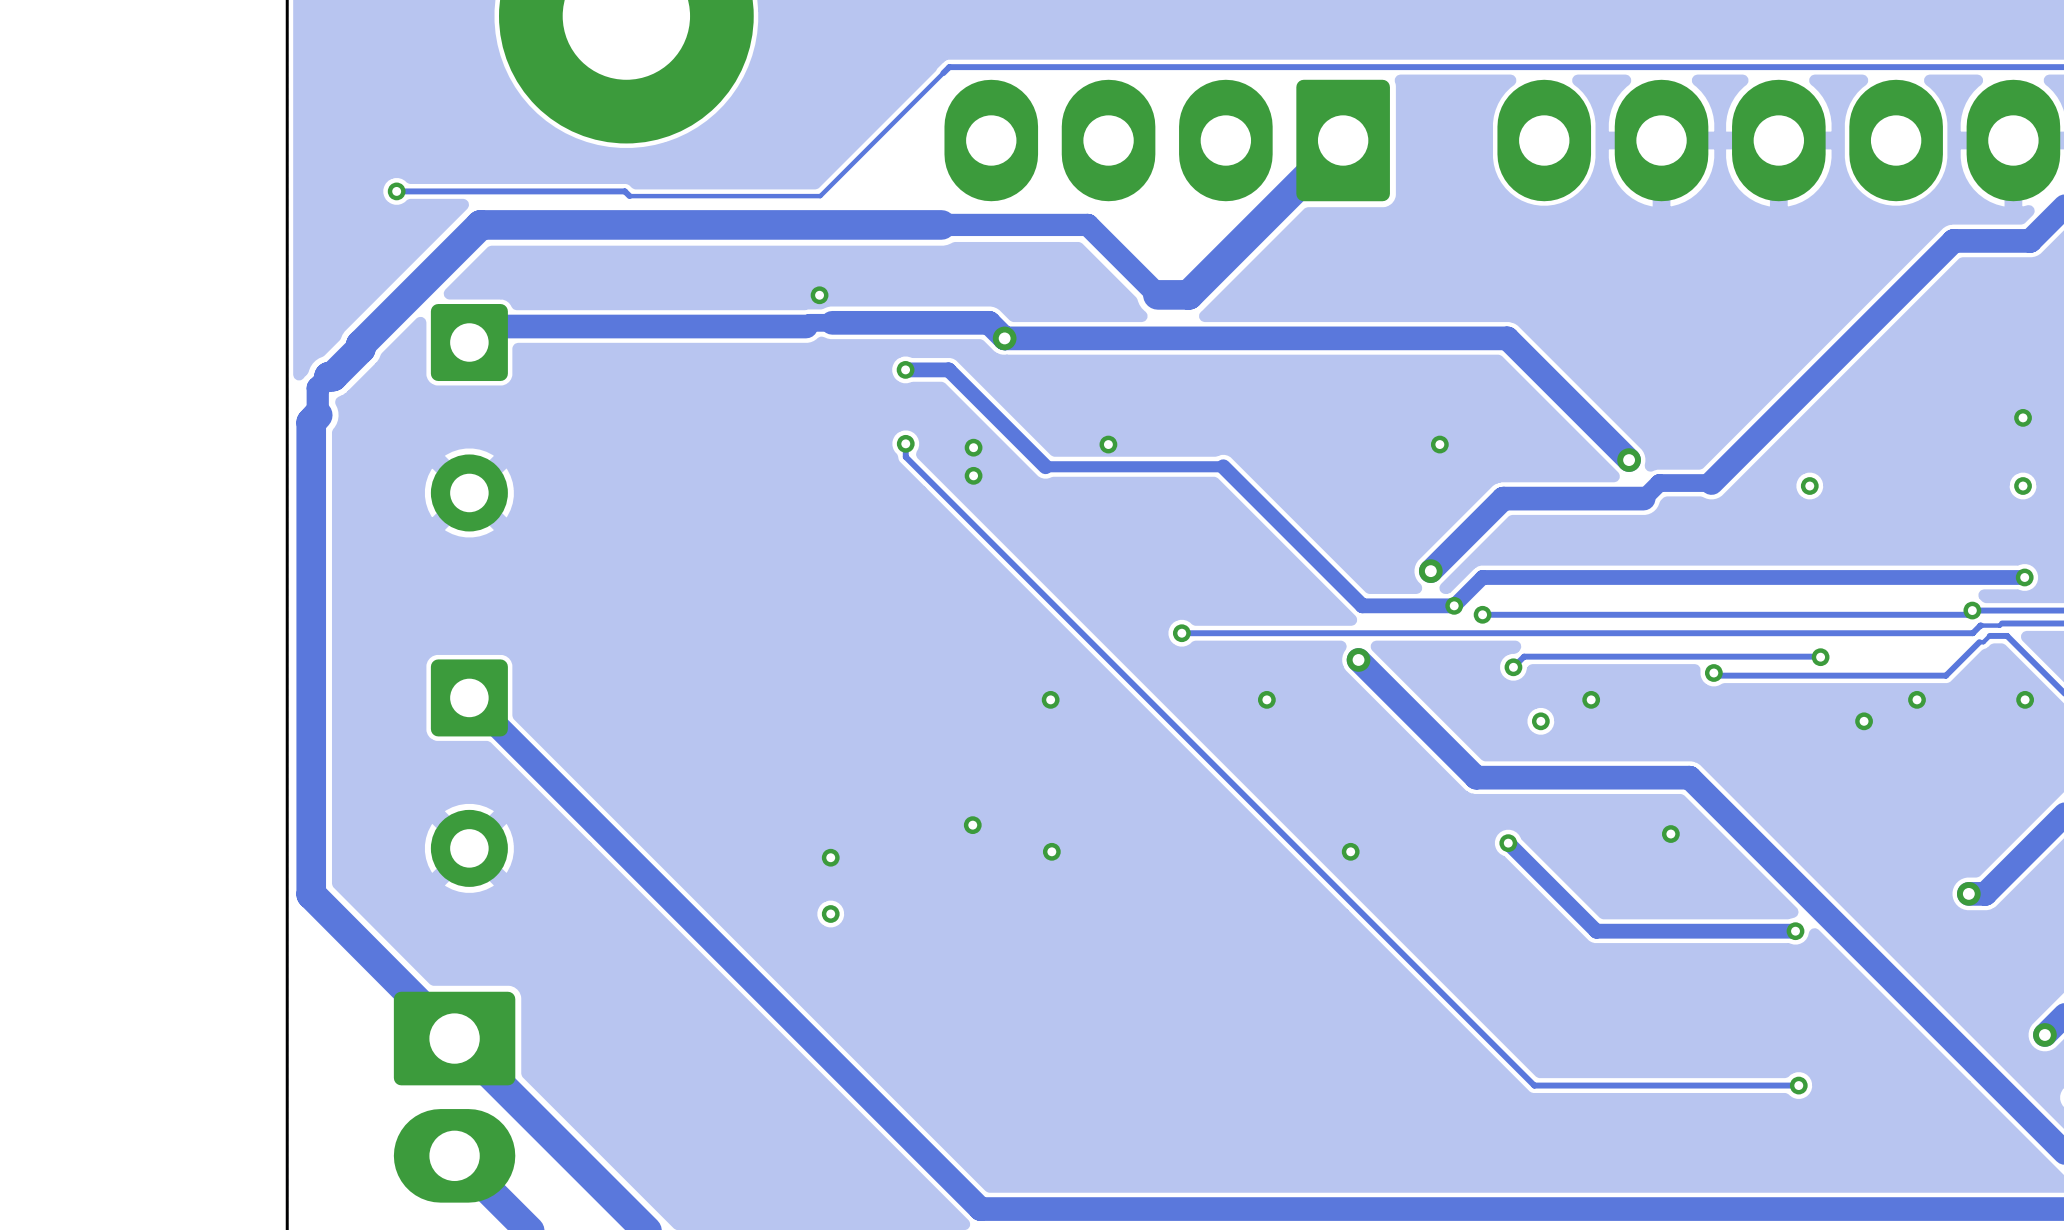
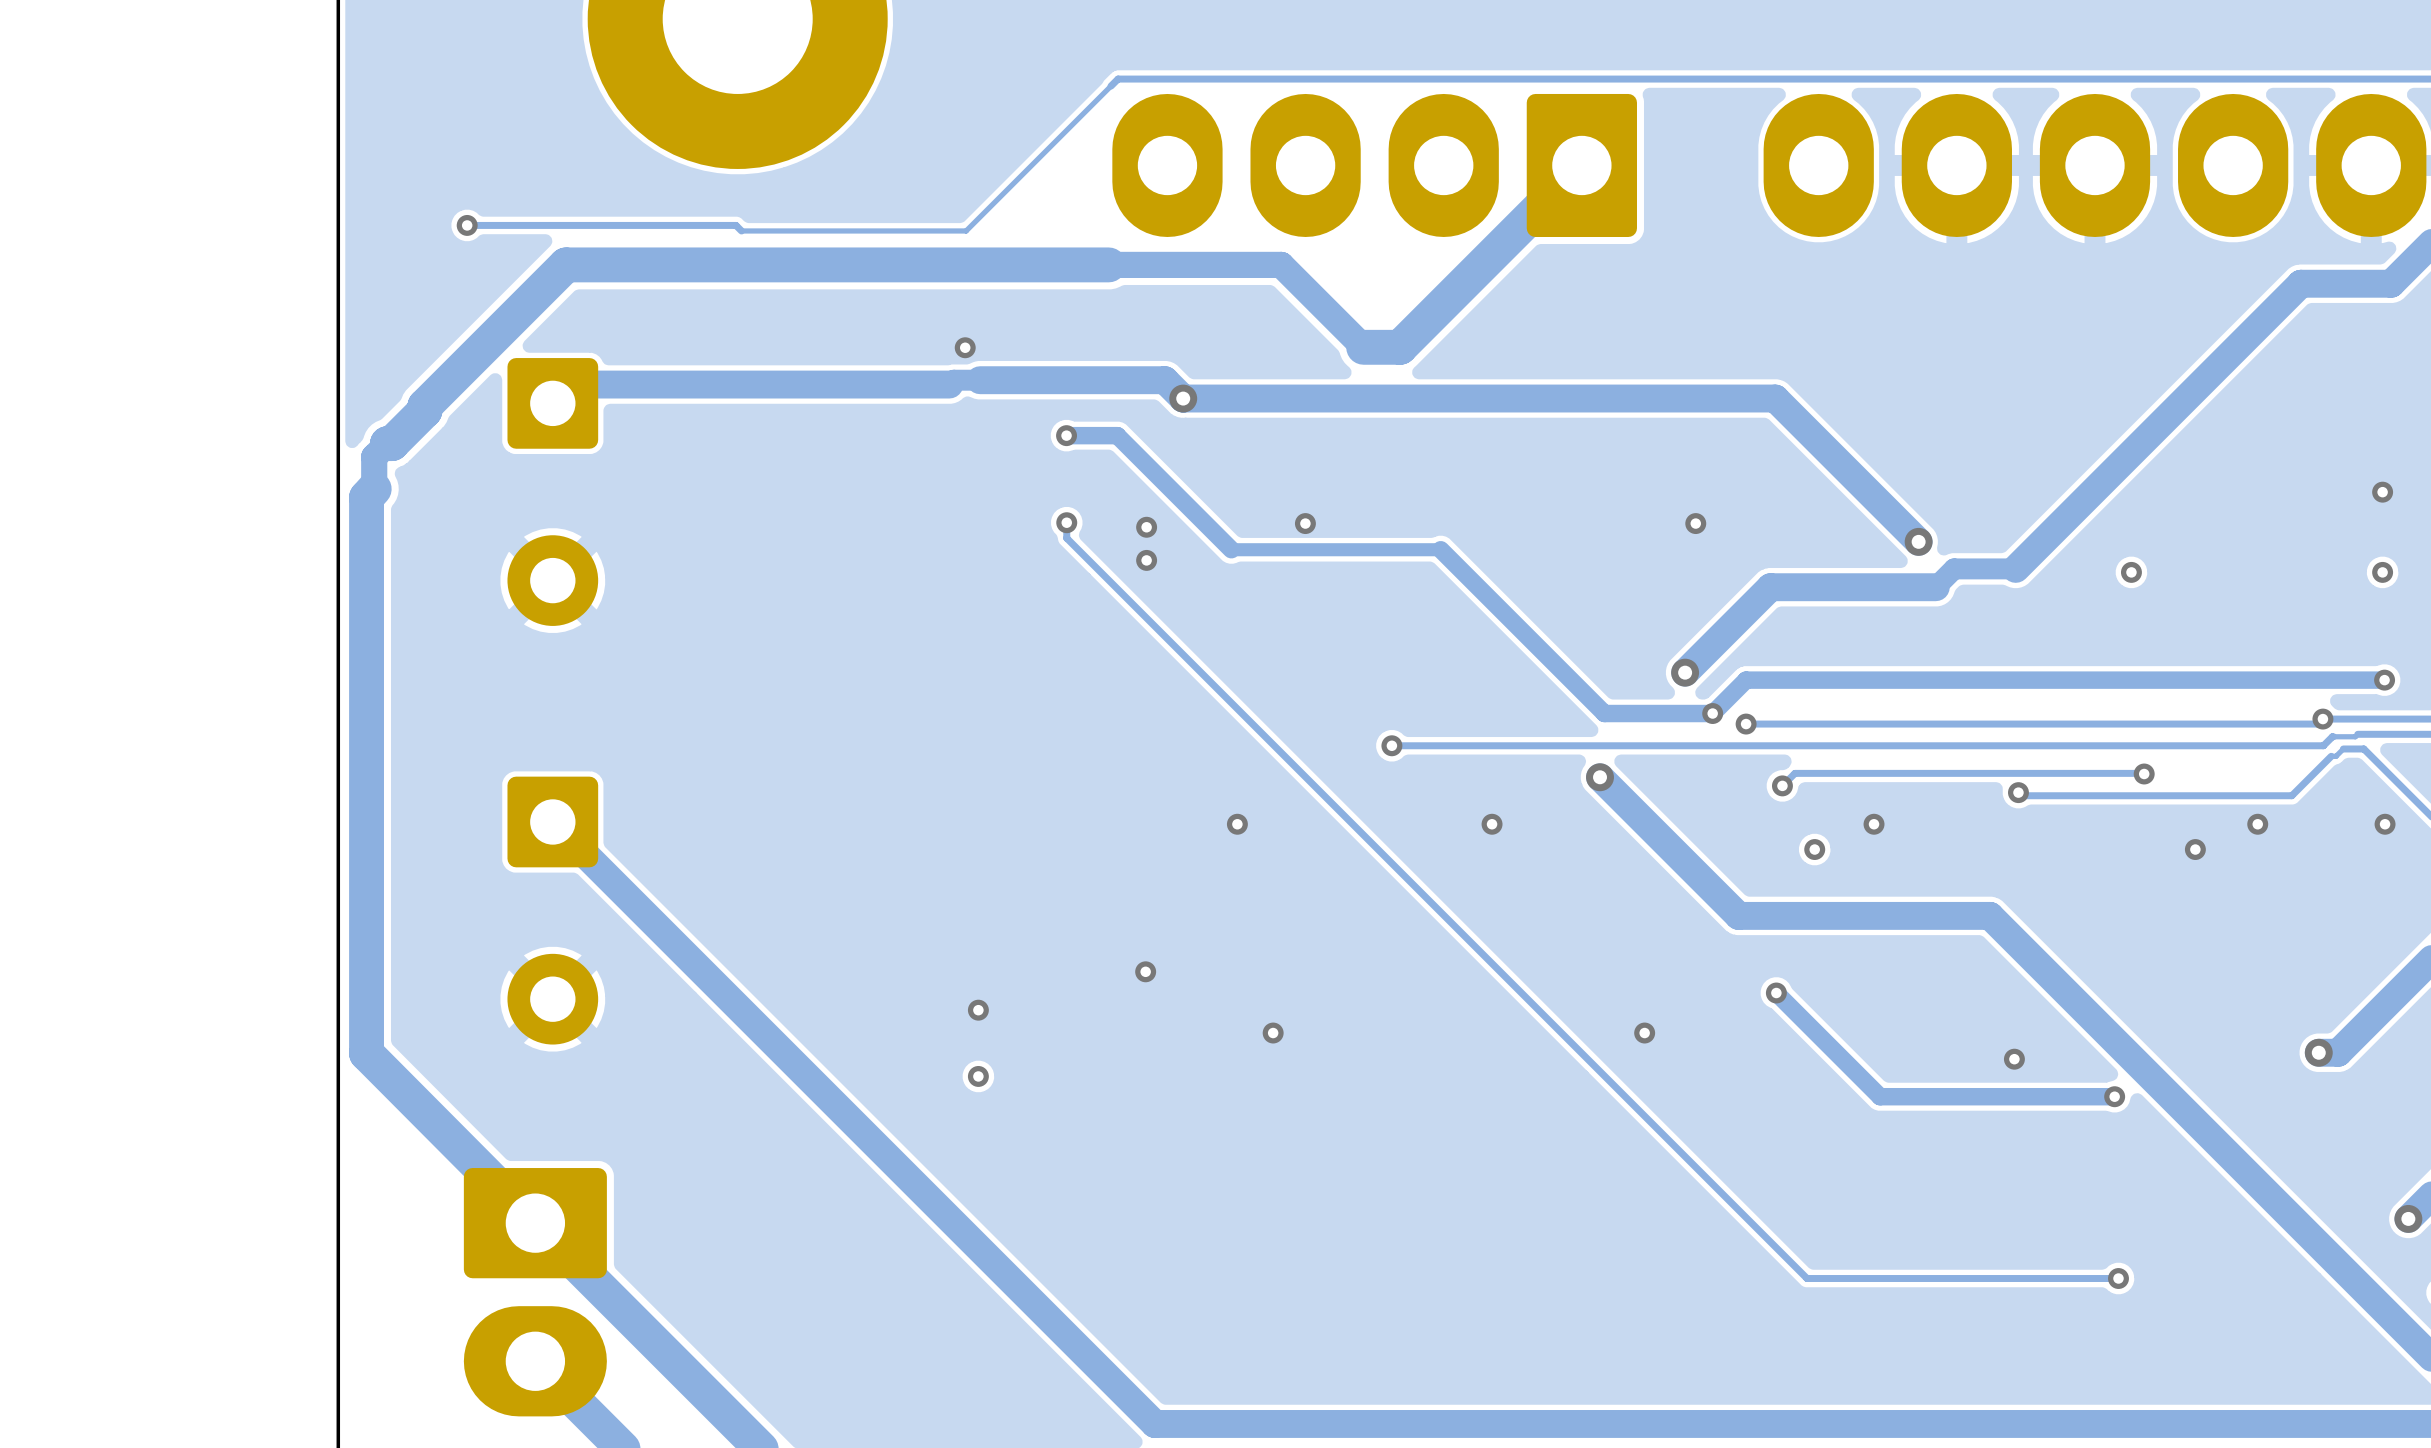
via position: (1670, 834) -> (2014, 1059)
via position: (1051, 851) -> (1273, 1033)
via position: (1350, 851) -> (1644, 1033)

